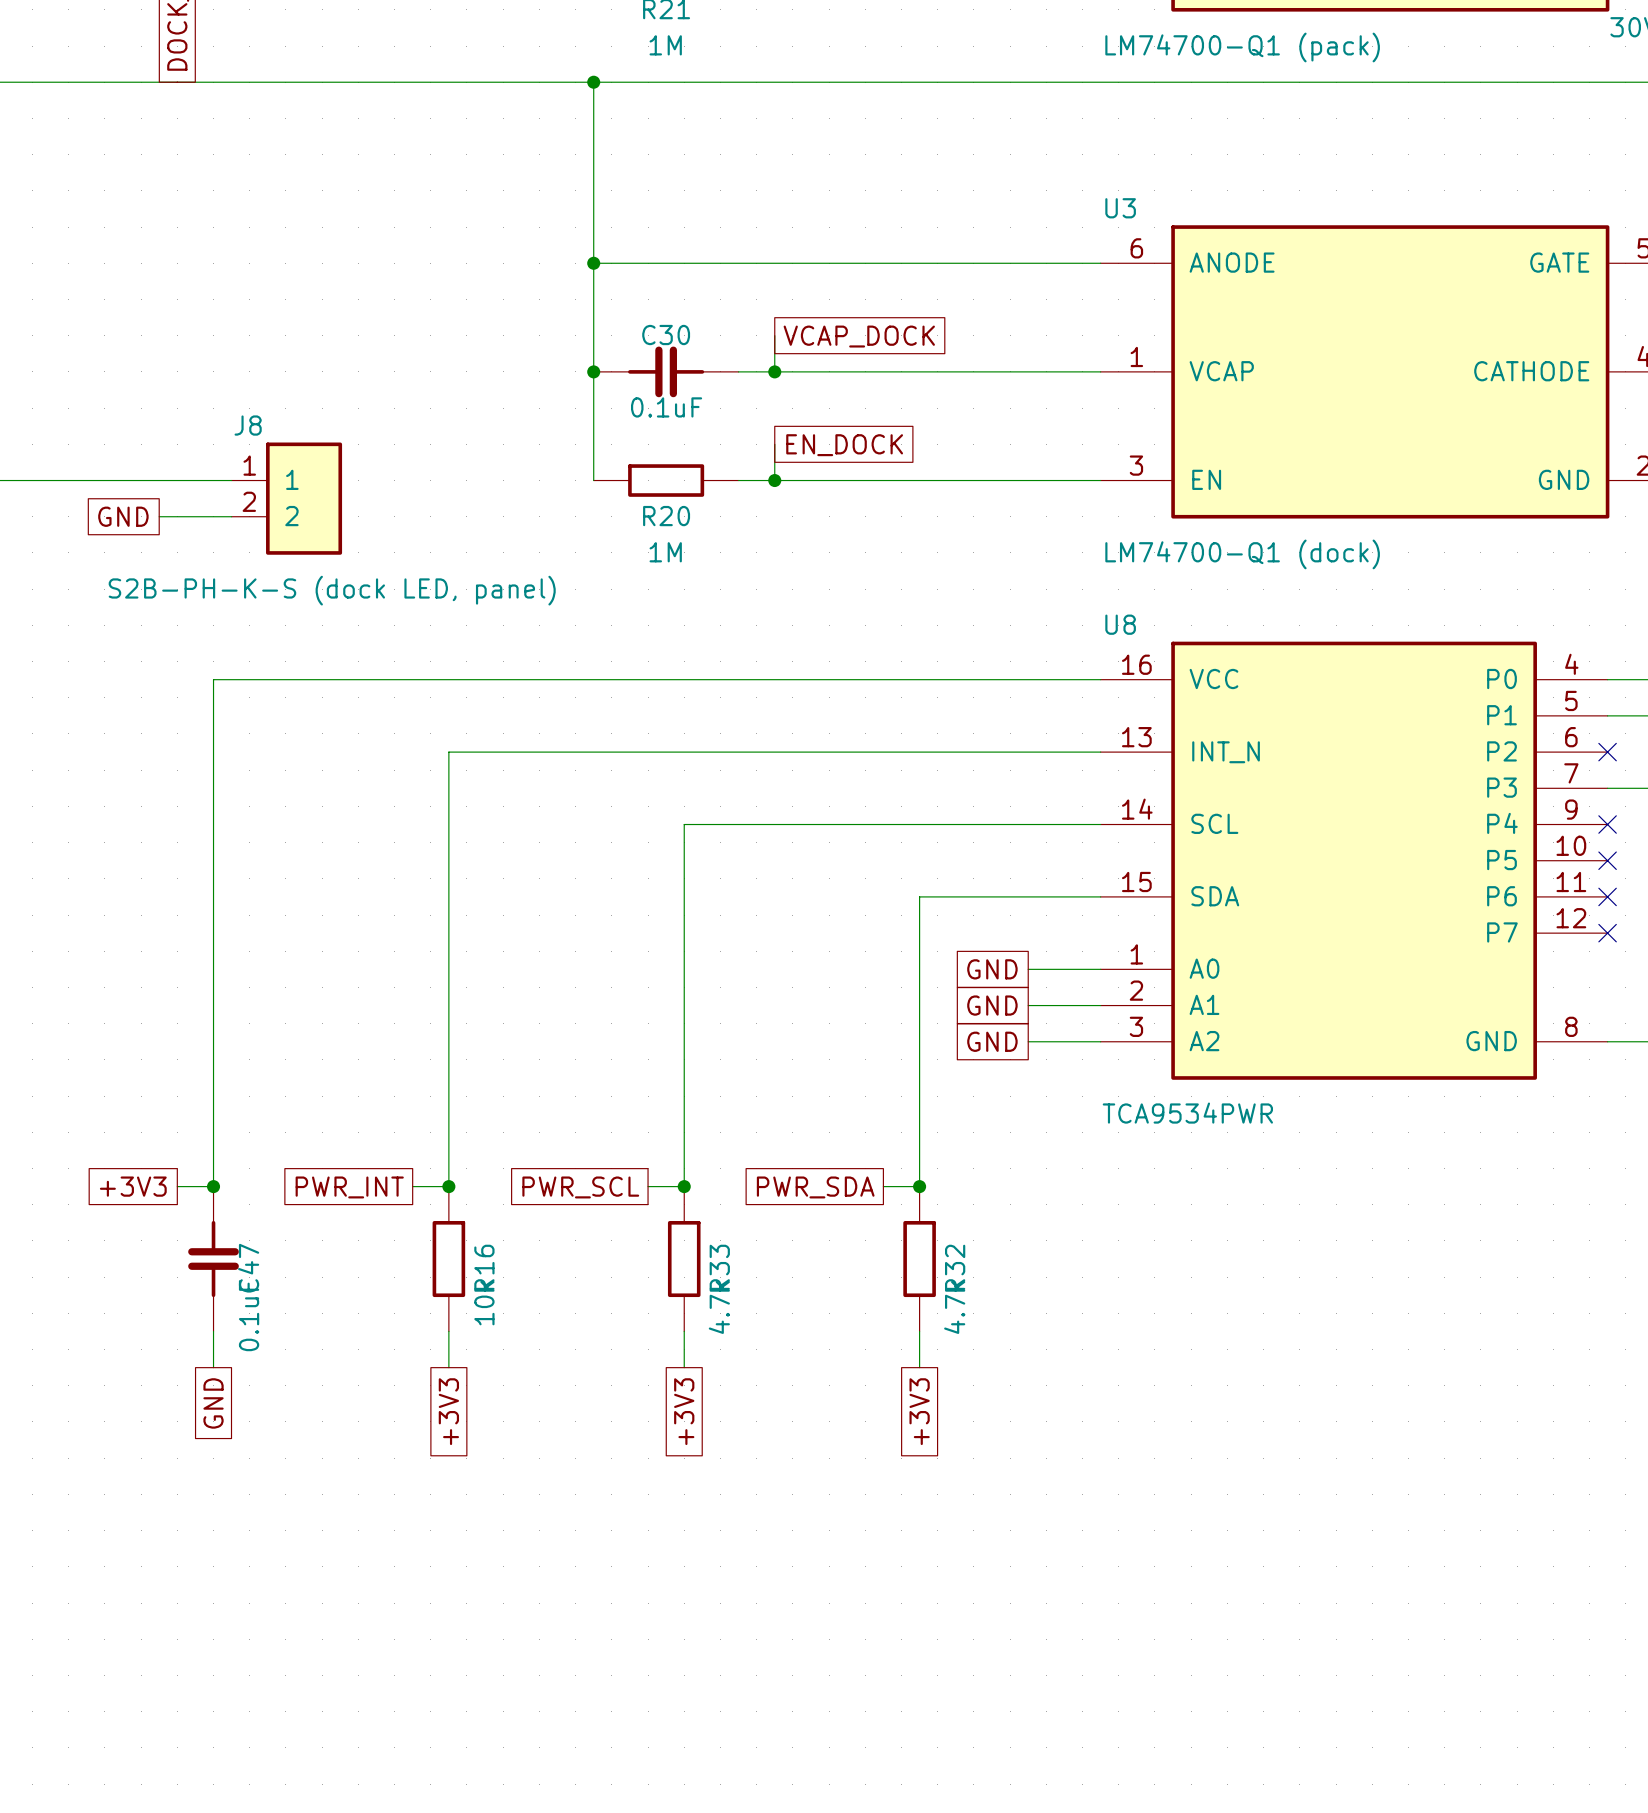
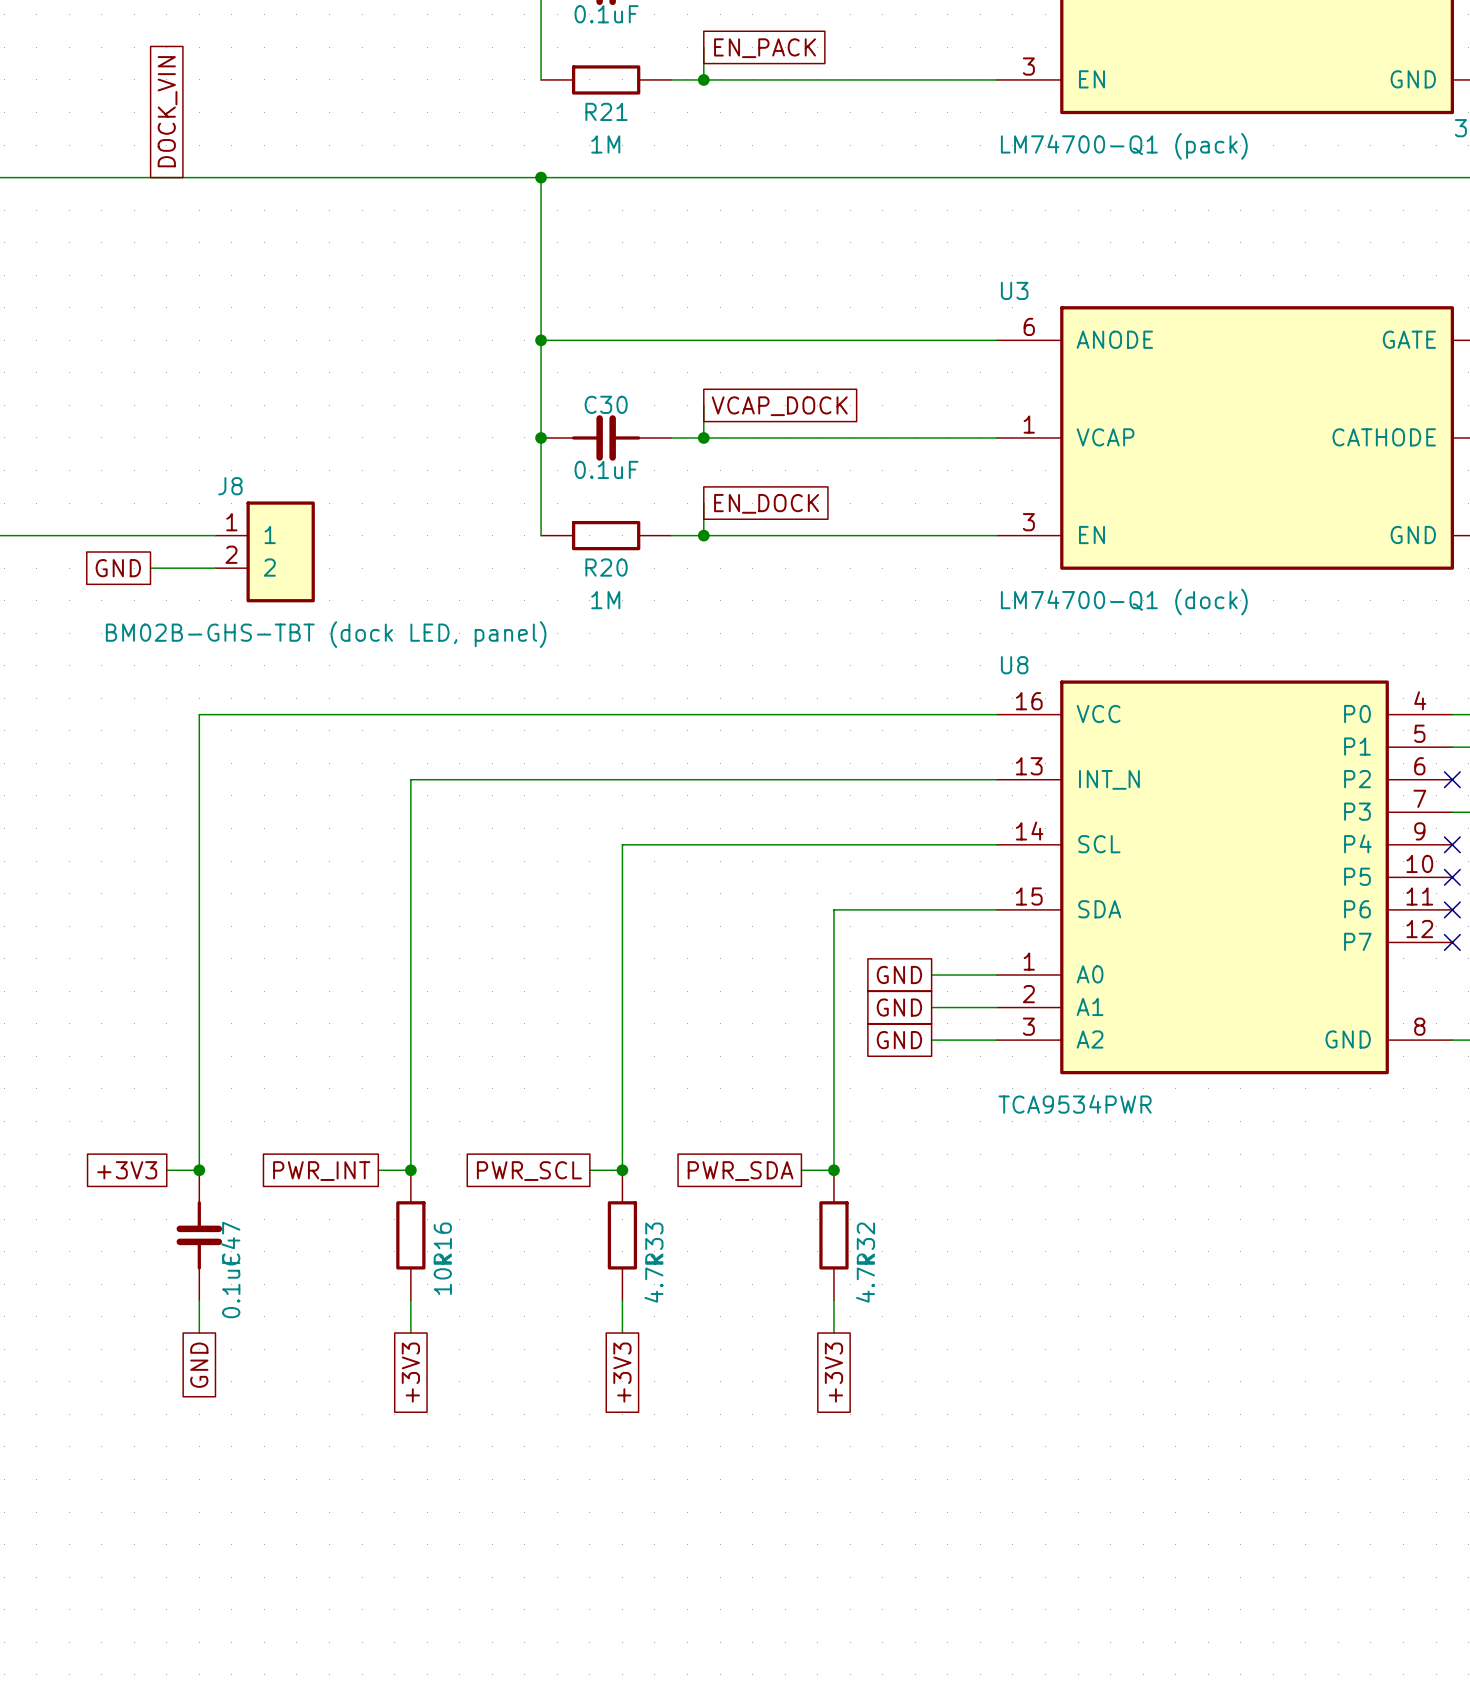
J8 value: S2B-PH-K-S (dock LED, panel) (332, 590) -> BM02B-GHS-TBT (dock LED, panel) (326, 634)

